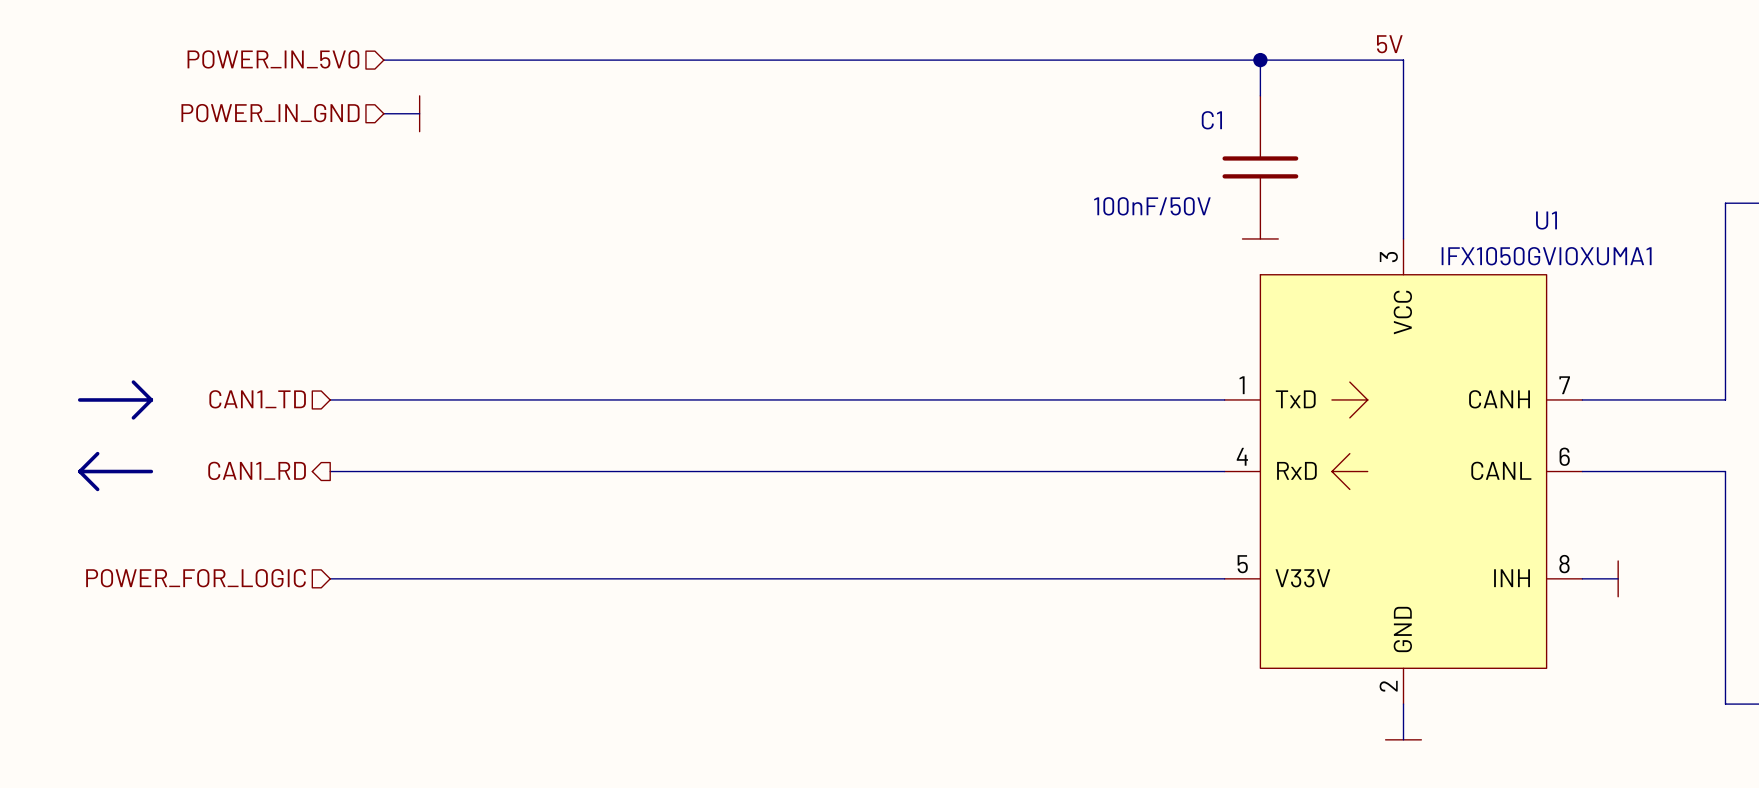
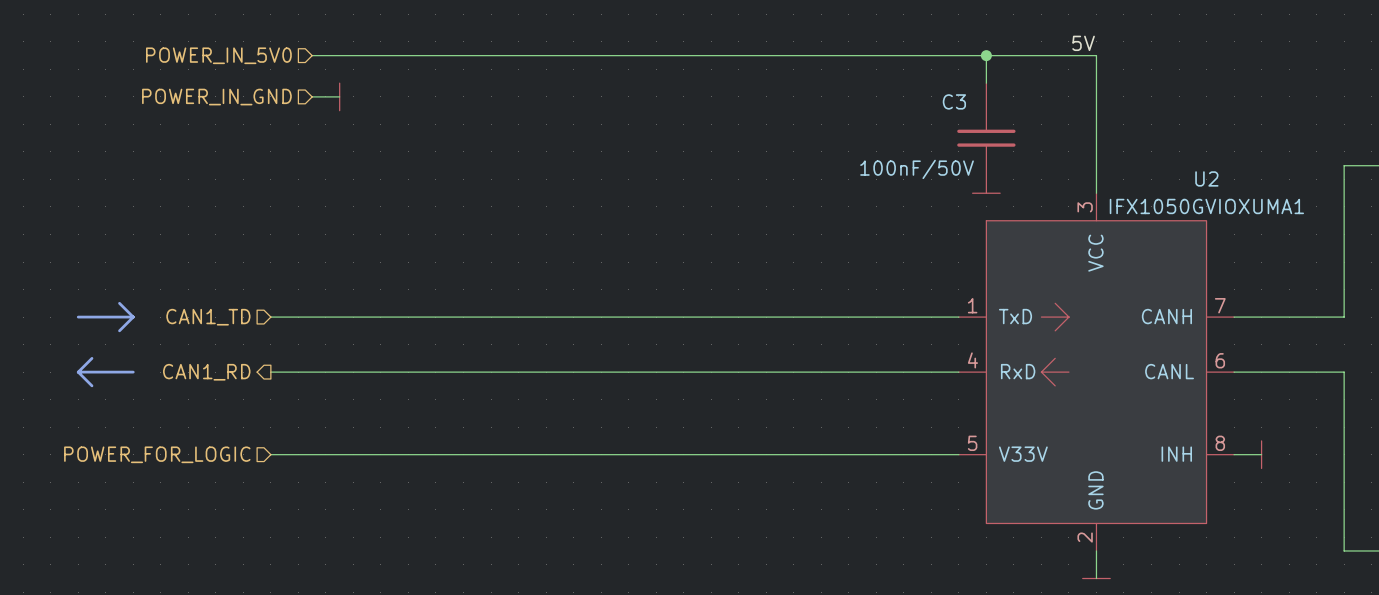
C1 name: C1 (1211, 120) -> C3 (954, 101)
U1 name: U1 (1546, 220) -> U2 (1206, 178)

